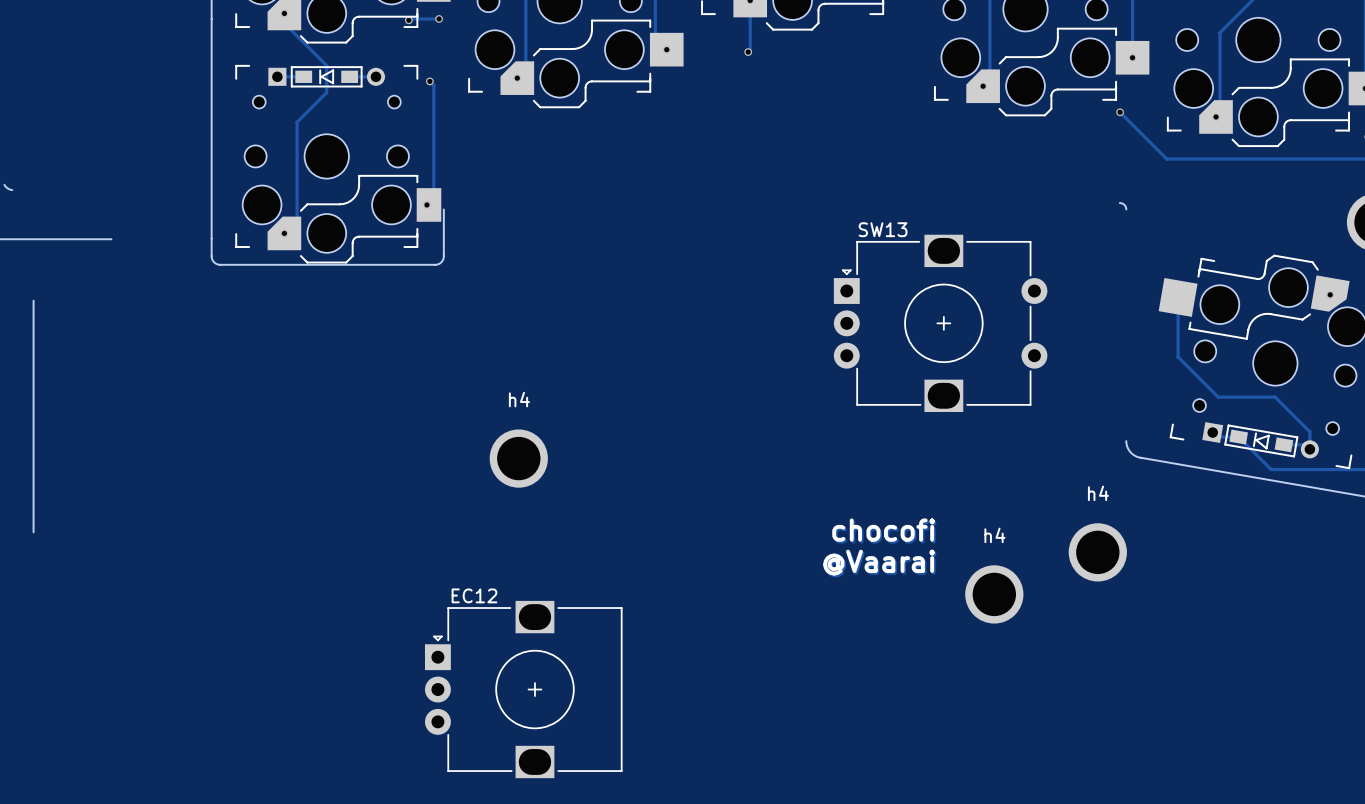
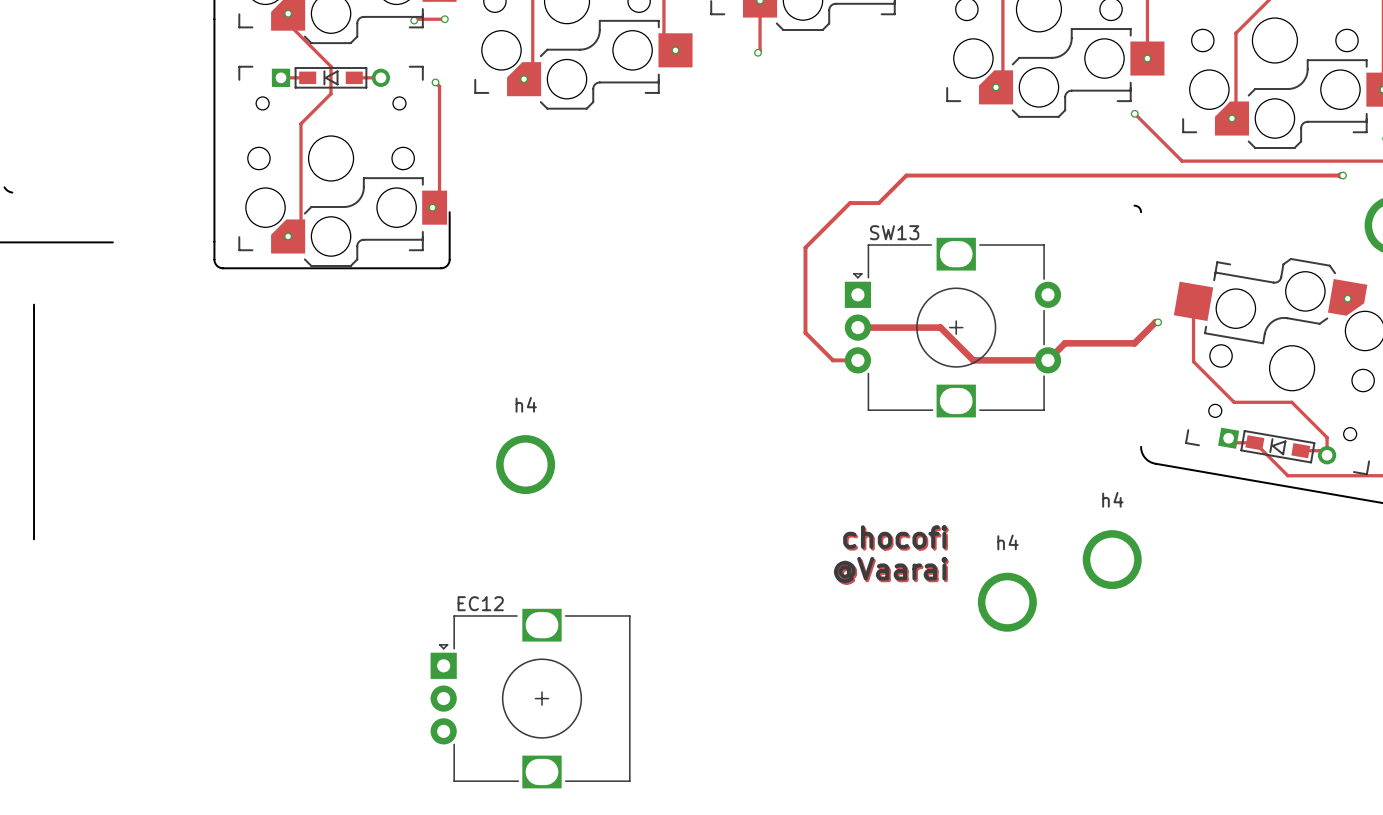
track: none -> (1340, 175) (1342, 175) (906, 175) (878, 203) (850, 203) (805, 247) (805, 332) (833, 360) (857, 360)
via: none -> (1342, 175)
track: none -> (1158, 322) (1155, 322) (1134, 343) (1065, 343) (1048, 360) (973, 360) (940, 327) (857, 327)
via: none -> (1158, 322)

